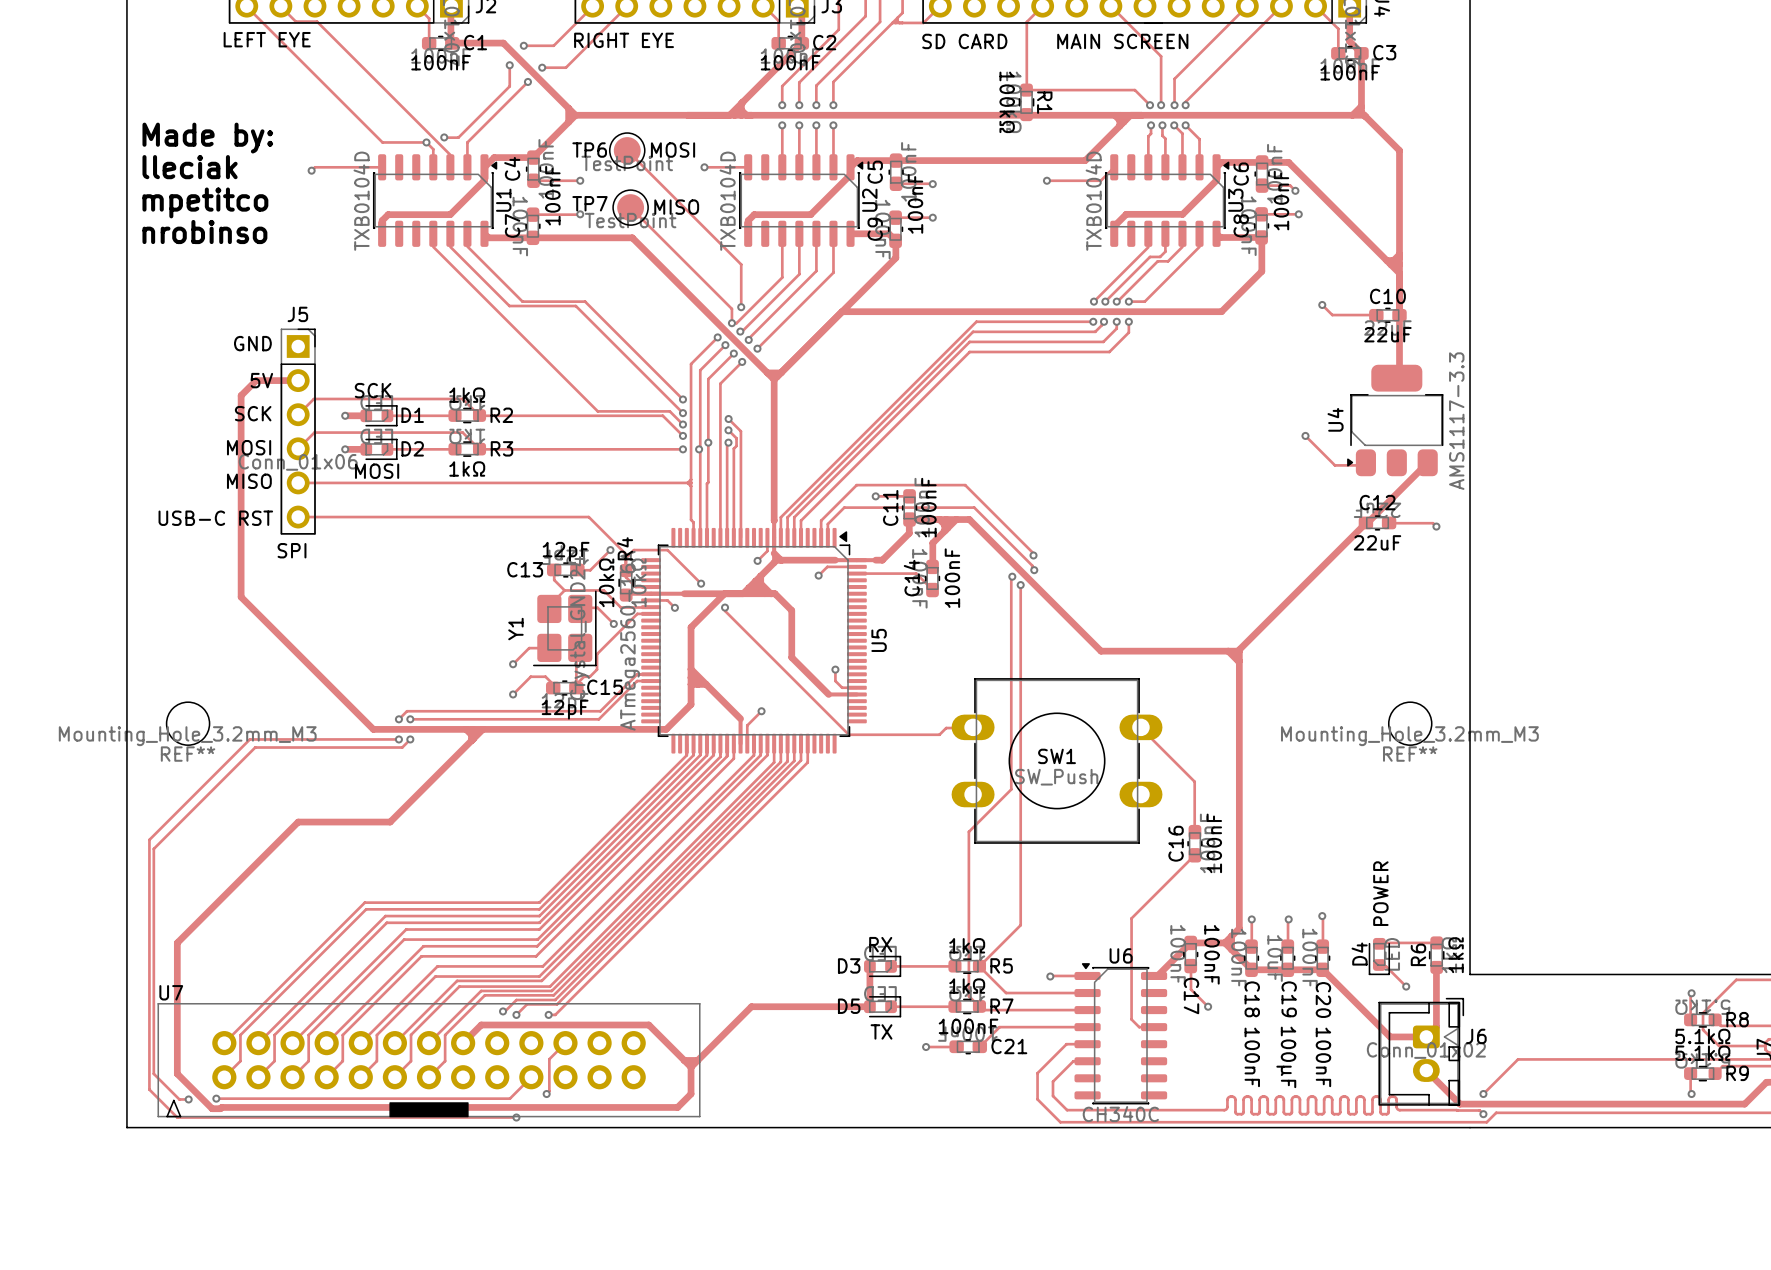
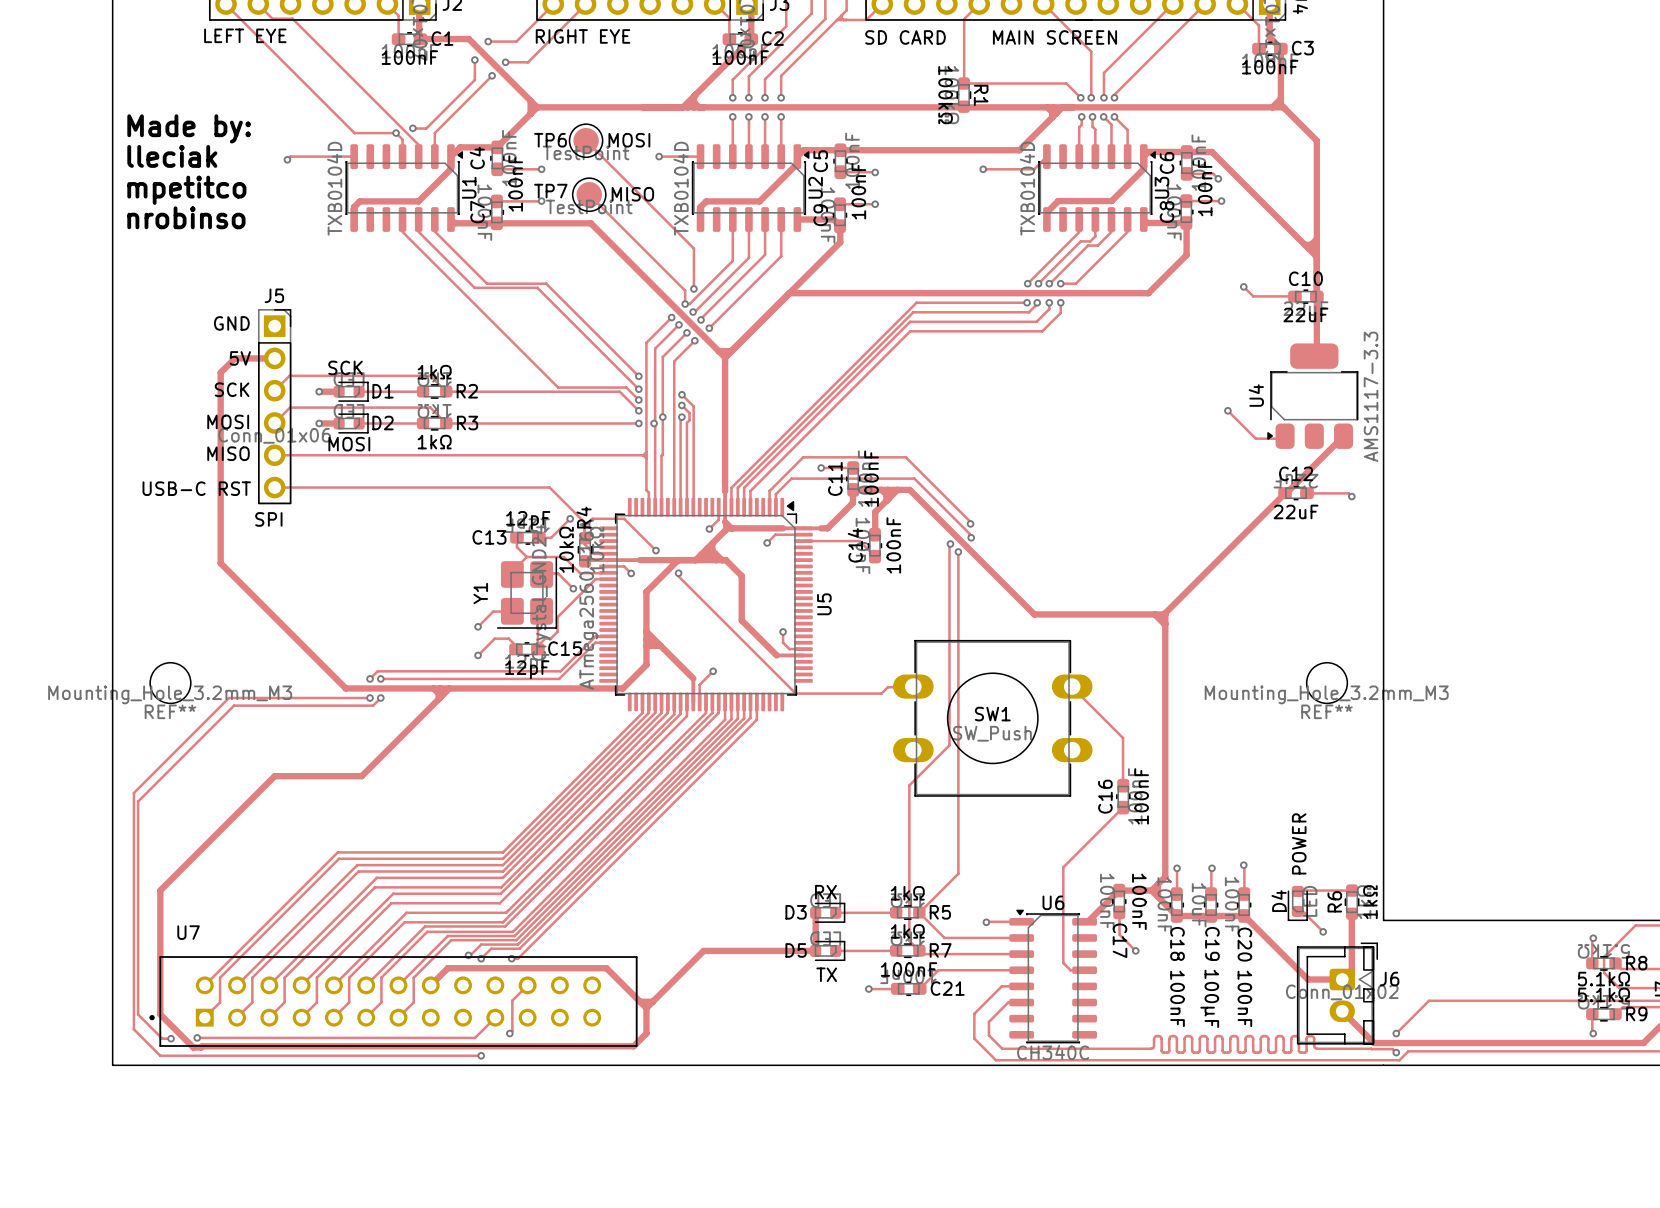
U7 name position: U7 (171, 992) -> U7 (188, 932)
U7 footprint: [157, 1003, 701, 1118] -> [149, 956, 638, 1047]

